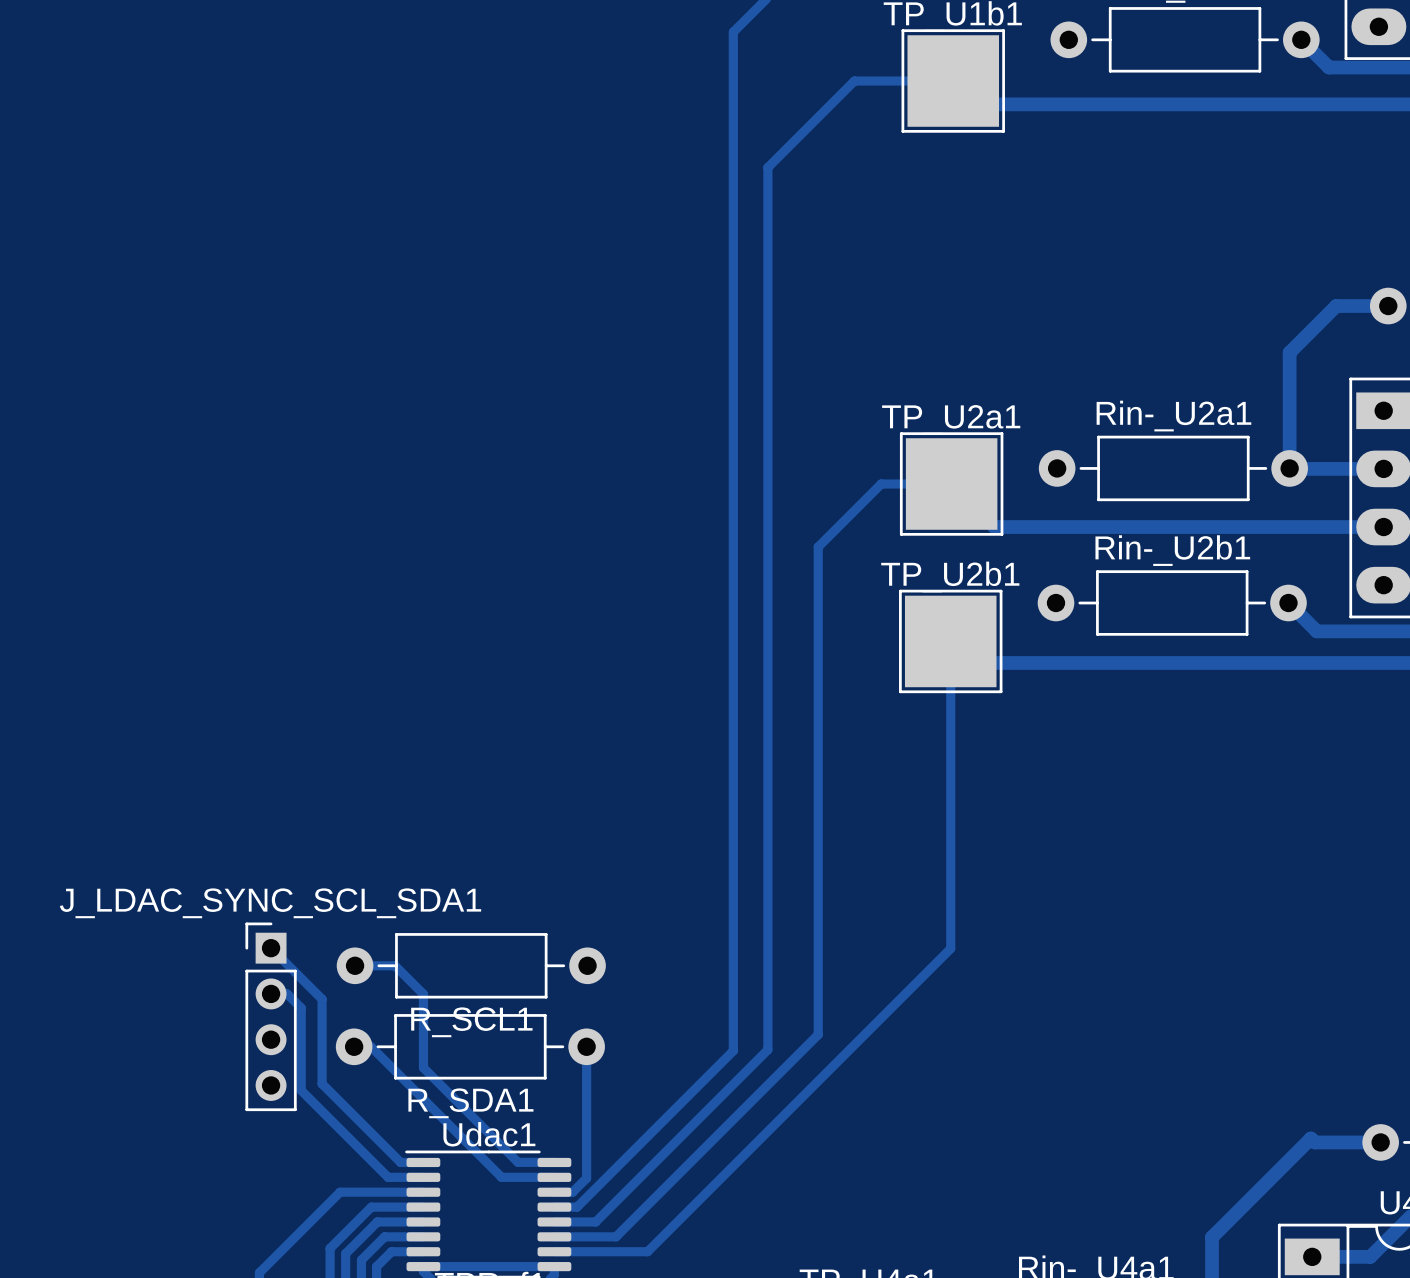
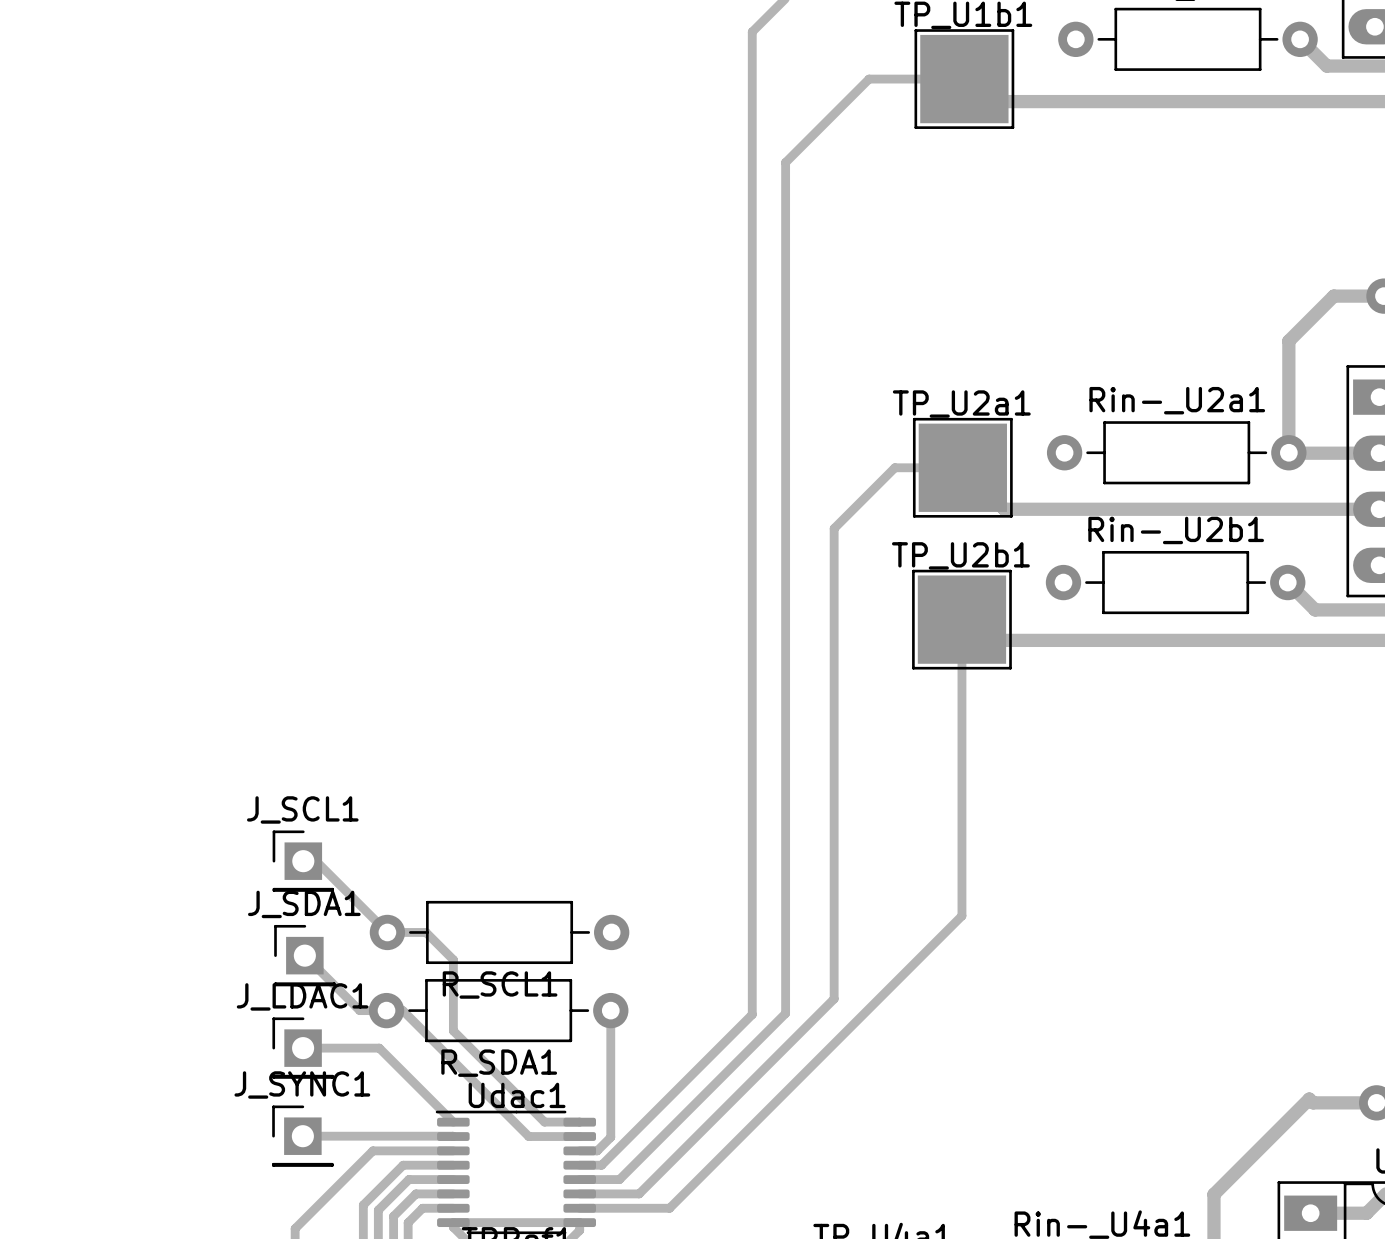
track: none -> (303, 861) (316, 861) (387, 932)
J_SCL1: none -> (303, 861)
track: (271, 948) (322, 999) (322, 1083) (400, 1162) (423, 1162) -> (304, 1046) (303, 1048) (379, 1048) (453, 1122)
track: none -> (304, 955) (359, 1010) (386, 1010)
J_SDA1: none -> (304, 955)
track: (271, 993) (287, 993) (301, 1008) (301, 1090) (388, 1177) (423, 1177) -> (302, 1136) (453, 1136)
J_LDAC_SYNC_SCL_SDA1: (271, 1016) -> none
J_LDAC1: none -> (303, 1048)
J_SYNC1: none -> (302, 1136)

